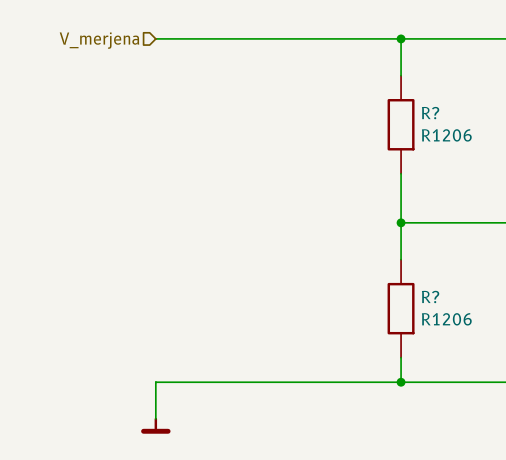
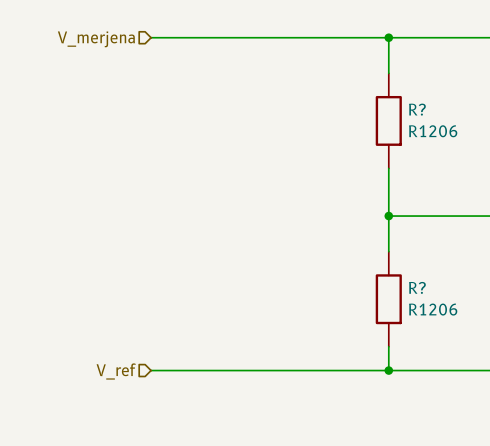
wire: (155, 382) (155, 419) -> none
hierarchical label: none -> V_ref (116, 371)
power symbol: (155, 425) -> none

